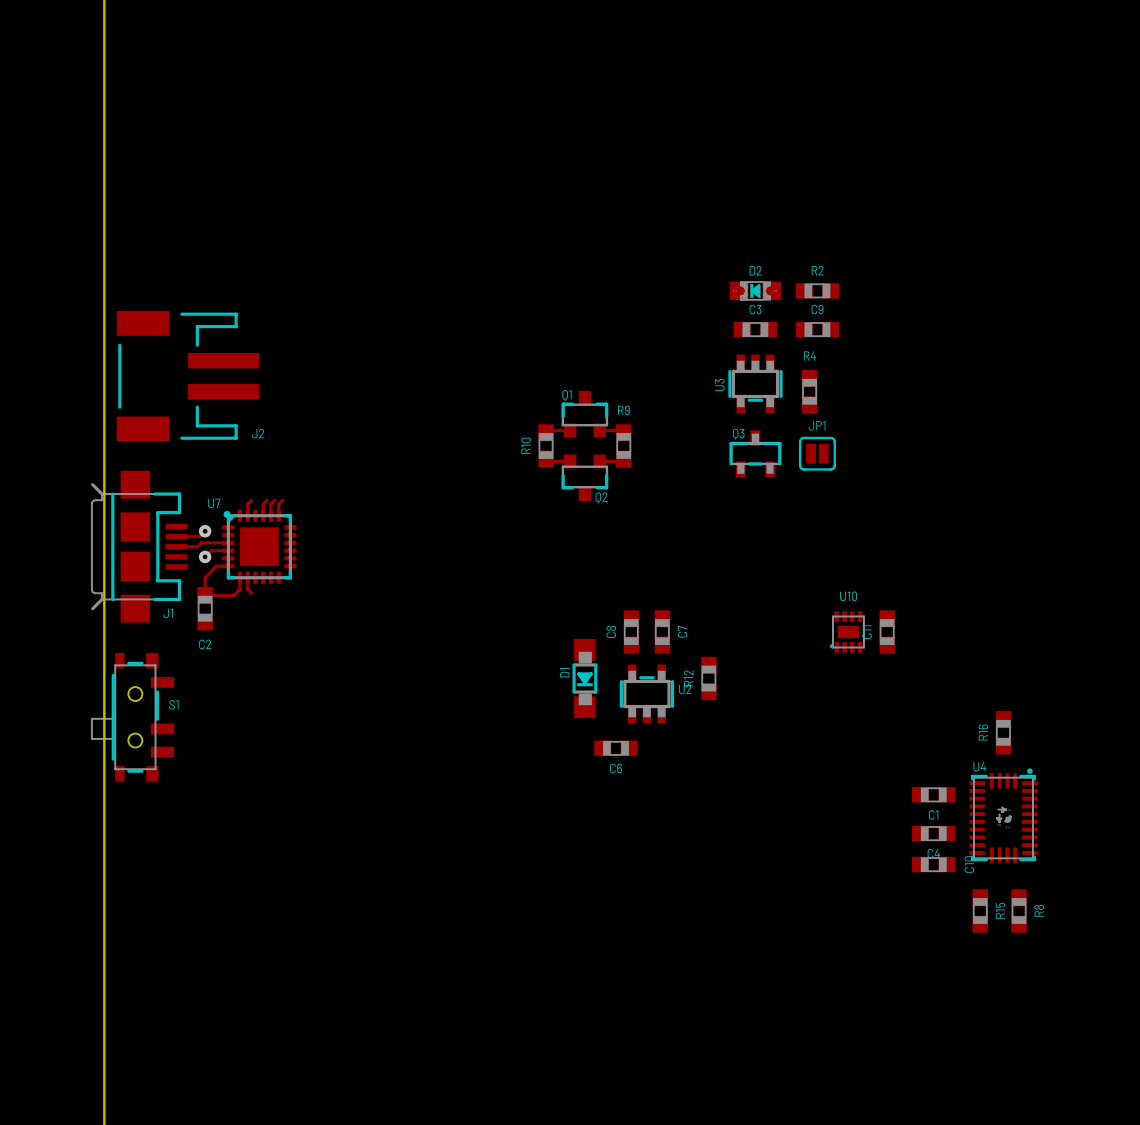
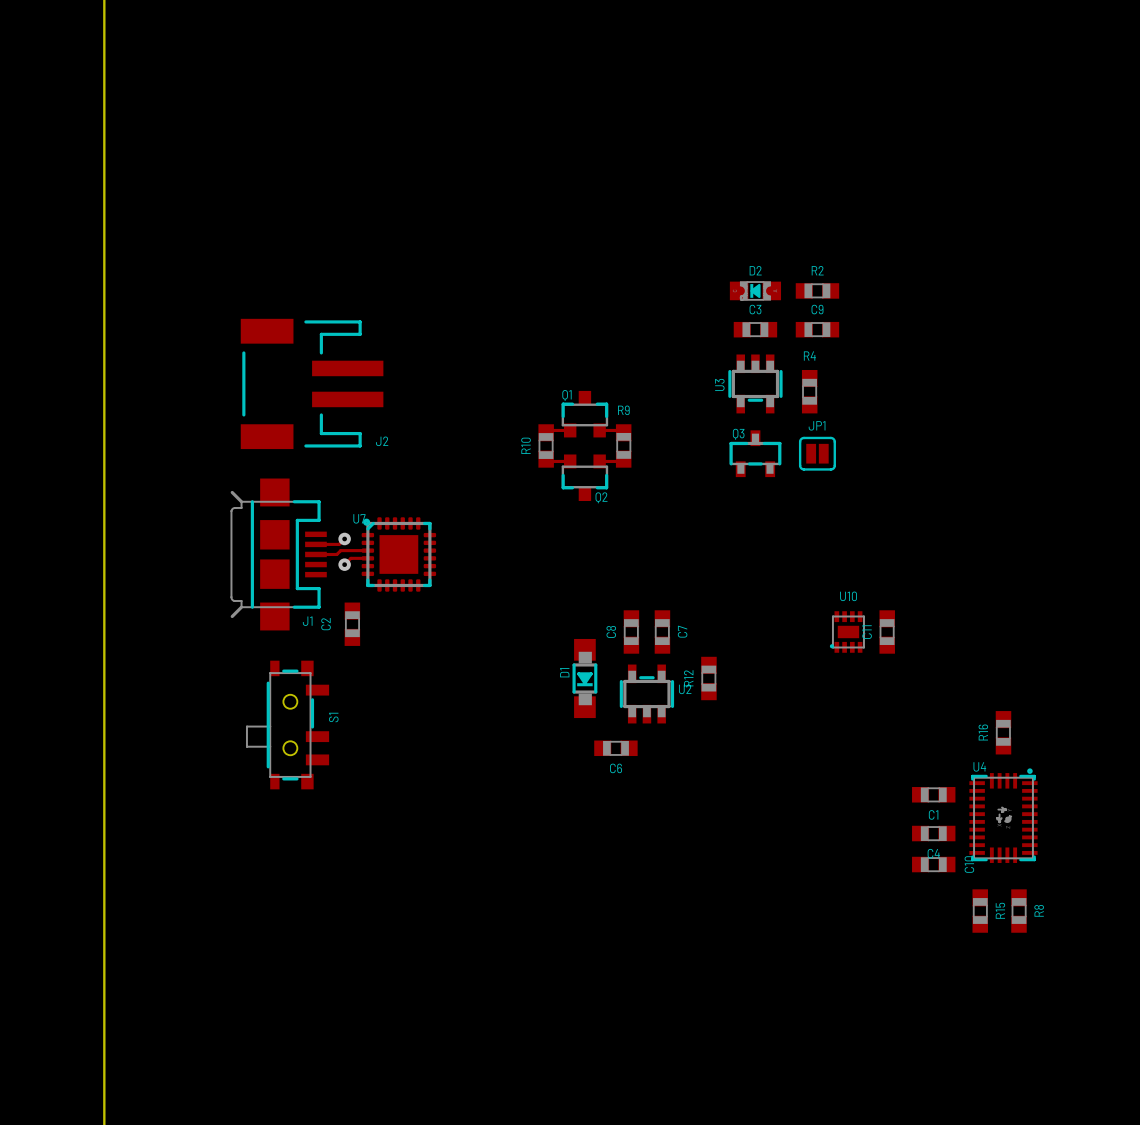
J2 position: (188, 376) -> (312, 383)
track: (251, 500) (247, 504) (247, 515) -> none
track: (267, 500) (263, 504) (263, 515) -> none
track: (274, 500) (270, 504) (270, 515) -> none
track: (282, 500) (278, 504) (278, 515) -> none
U7 name position: U7 (214, 503) -> U7 (359, 518)
track: (205, 531) (199, 536) (176, 536) -> (344, 538) (339, 544) (315, 544)
via: (205, 531) -> none
via: none -> (344, 538)
track: (228, 542) (201, 542) (197, 546) (176, 546) -> (367, 550) (340, 550) (336, 554) (315, 554)
J1 position: (139, 546) -> (278, 554)
U7 position: (259, 546) -> (398, 554)
track: (228, 550) (211, 550) (205, 556) -> (367, 558) (350, 558) (344, 564)
via: (205, 556) -> none
track: (228, 558) (228, 566) (216, 566) (205, 577) (205, 595) (233, 595) (239, 589) (239, 577) -> none
via: none -> (344, 564)
track: (247, 577) (247, 589) (251, 593) -> none
C2 position: (205, 608) -> (352, 624)
C2 name rotation: 0° (205, 644) -> 90° counterclockwise (326, 624)
C2 name position: C2 (205, 644) -> C2 (326, 624)
S1 name rotation: 0° (173, 704) -> 90° counterclockwise (333, 717)
S1 position: (132, 717) -> (287, 725)

